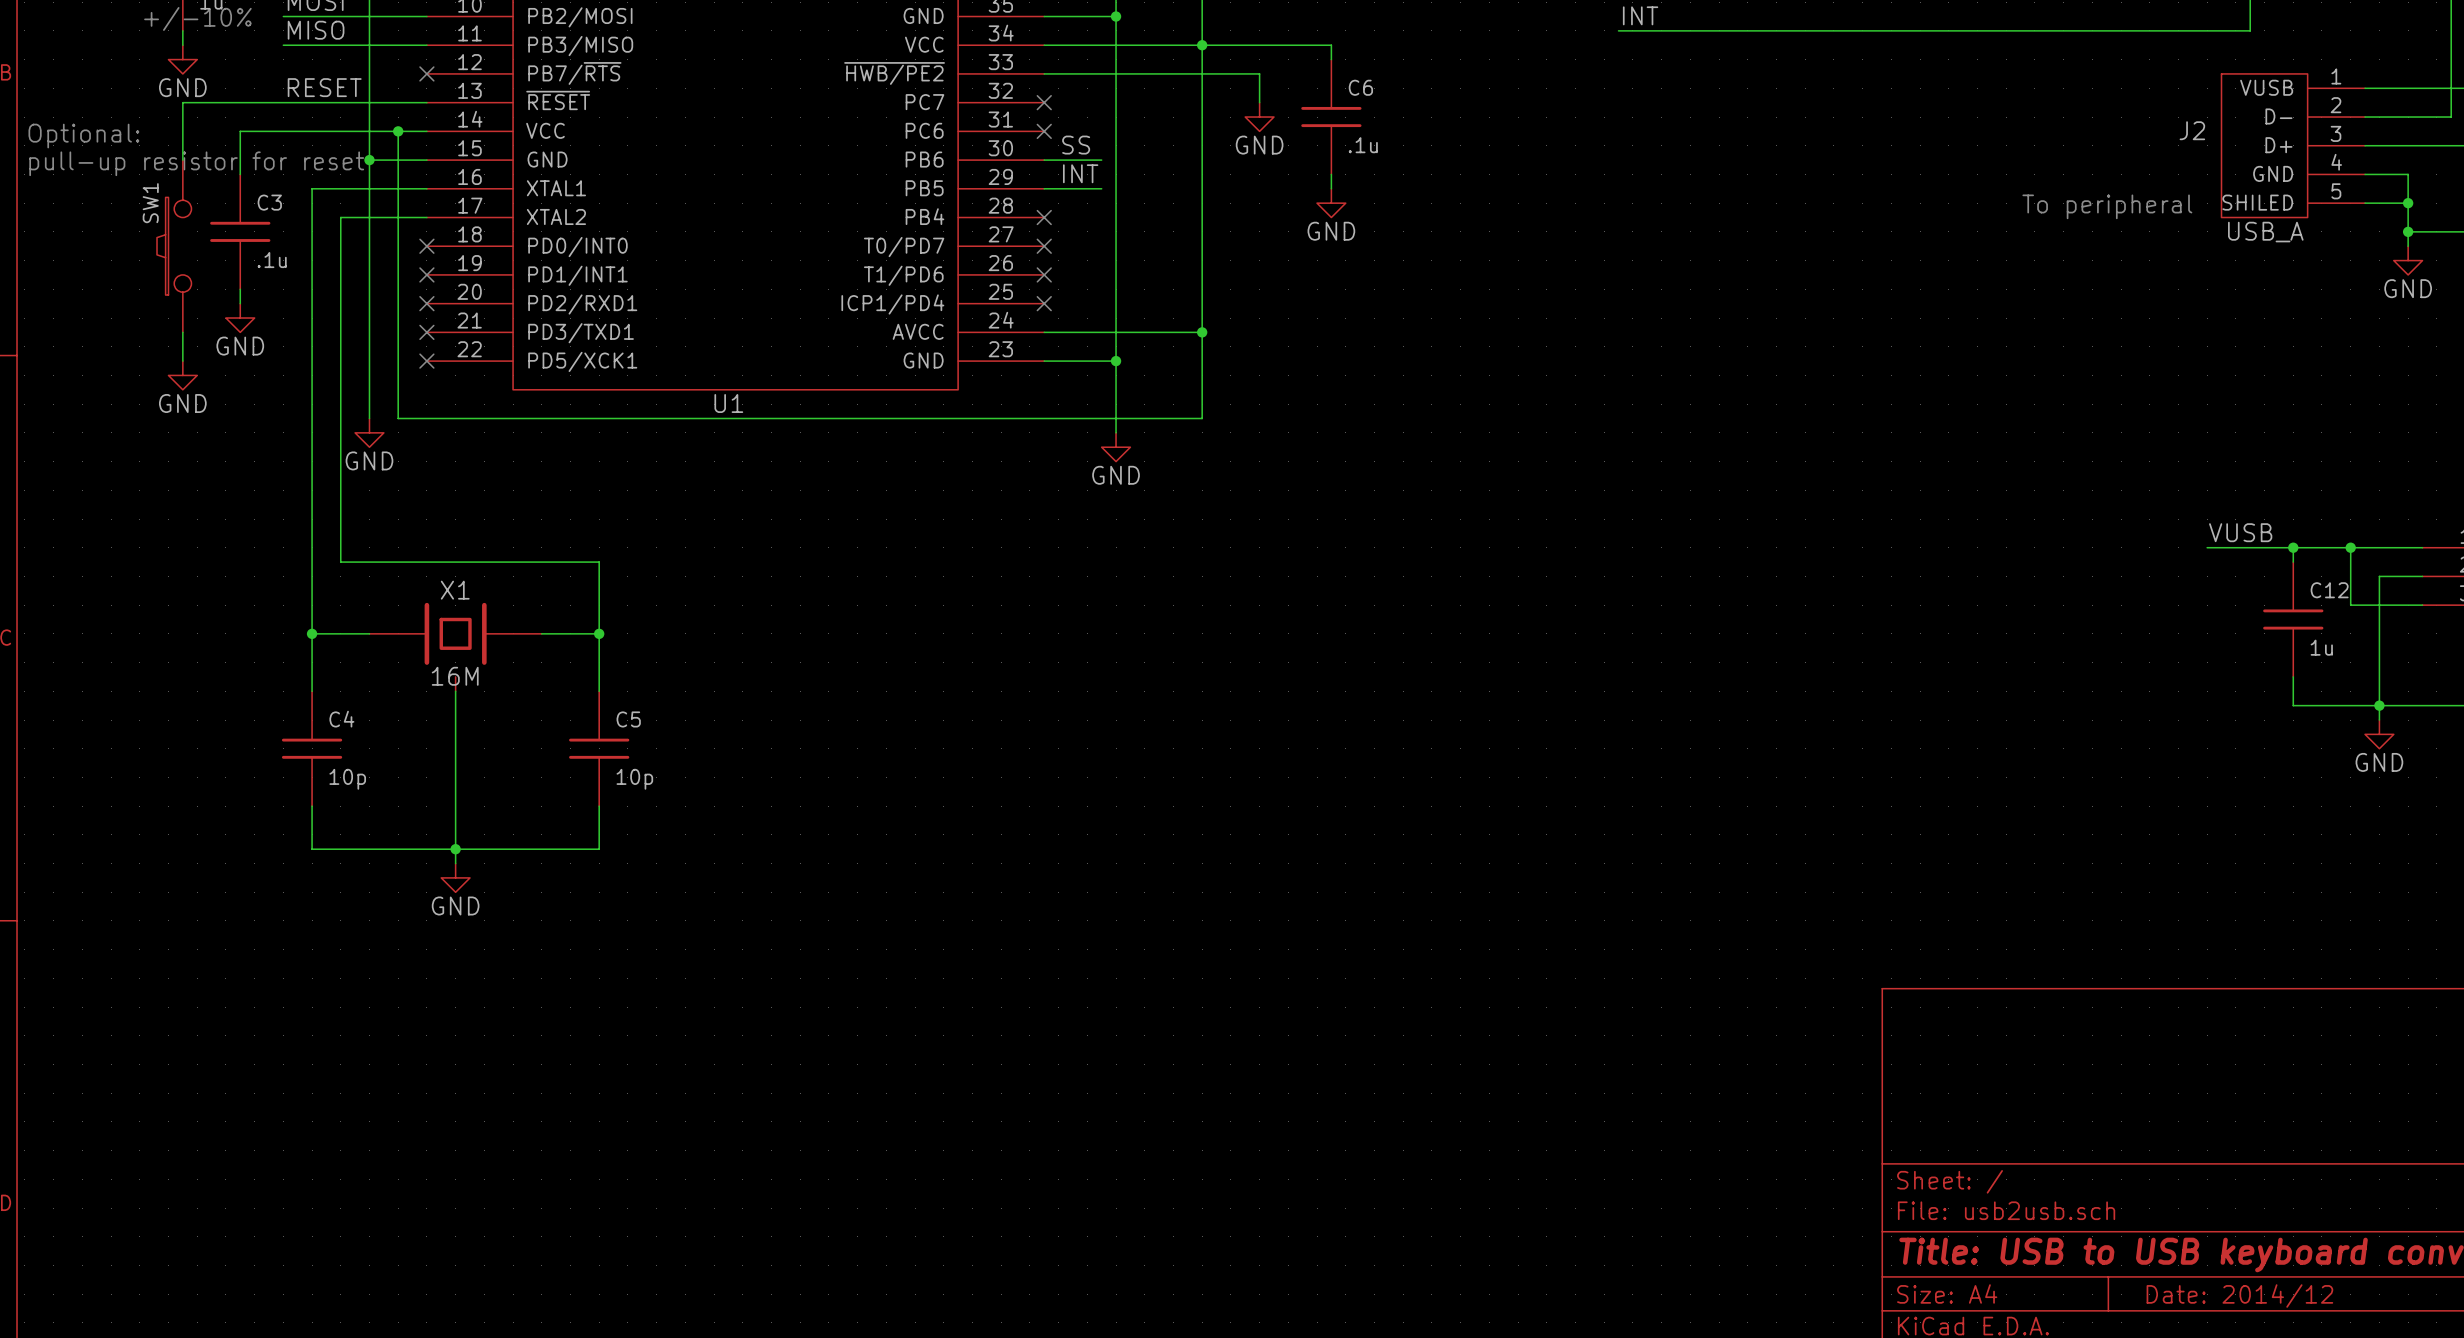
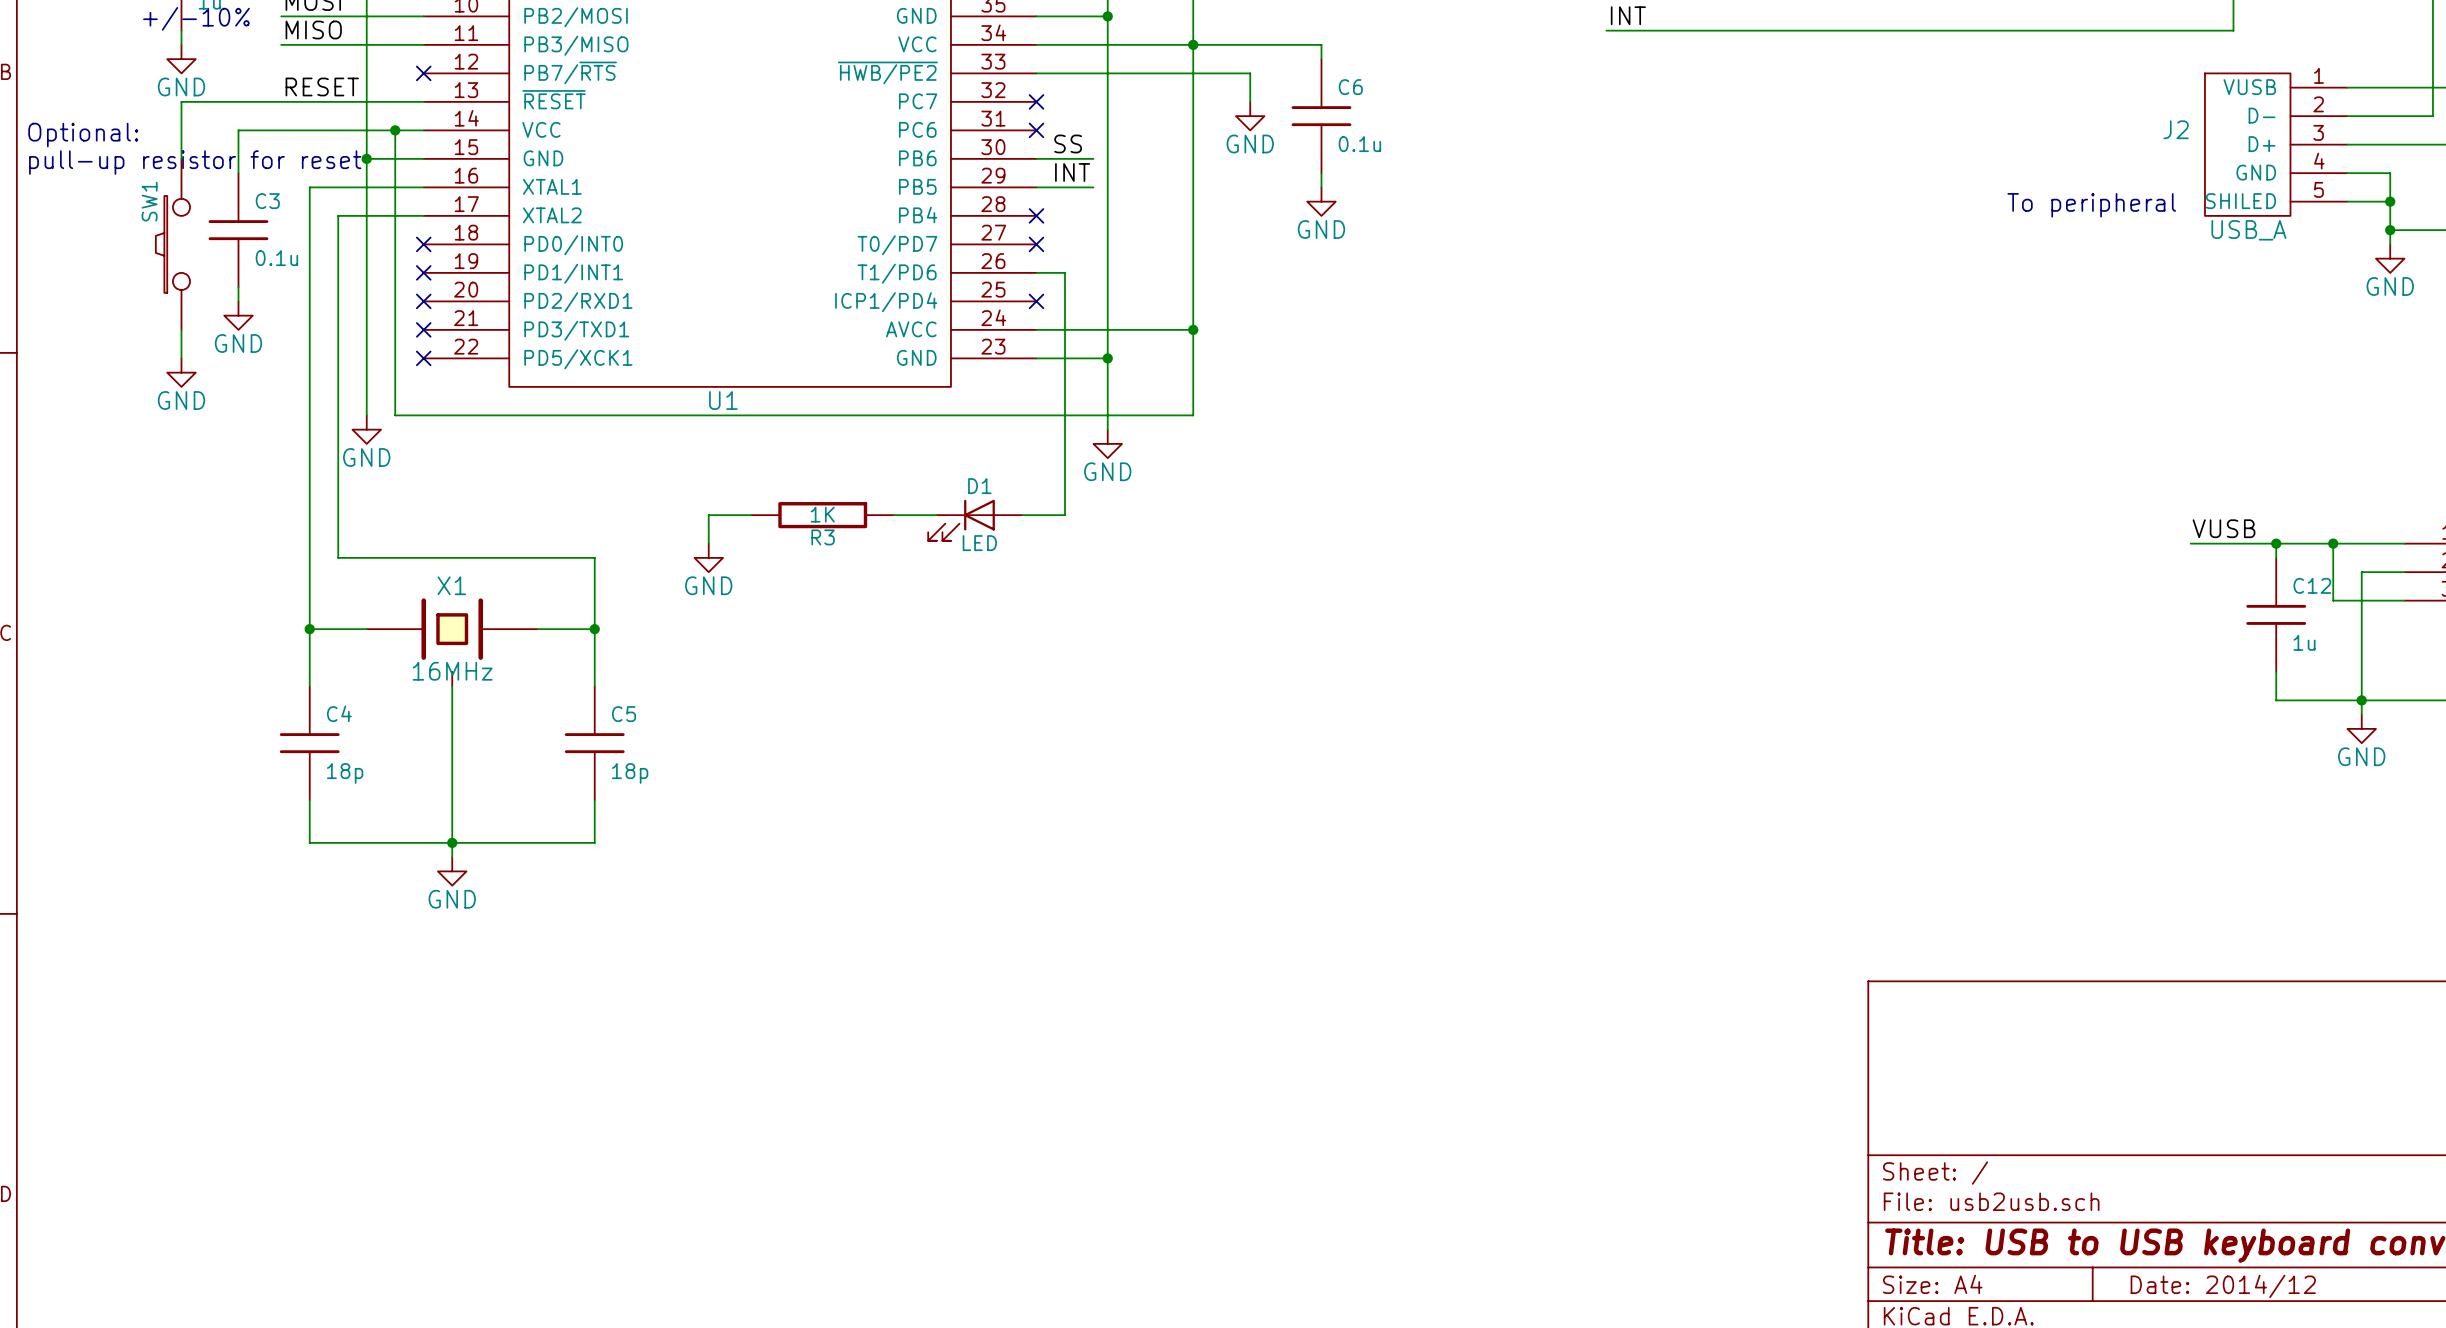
C6 value: .1u (1363, 145) -> 0.1u (1359, 144)
C3 value: .1u (272, 260) -> 0.1u (276, 258)
wire: none -> (1036, 272) (1064, 272) (1064, 515) (1022, 515)
no-connect mark: (1044, 274) -> none
wire: none -> (751, 515) (708, 515) (708, 543)
R3: none -> 1K (822, 515)
wire: none -> (893, 515) (936, 515)
D1: none -> LED (975, 520)
power symbol: none -> GND (708, 557)
X1 value: 16M (455, 676) -> 16MHz (452, 671)
C4 value: 10p (347, 779) -> 18p (345, 773)
C5 value: 10p (634, 779) -> 18p (630, 773)

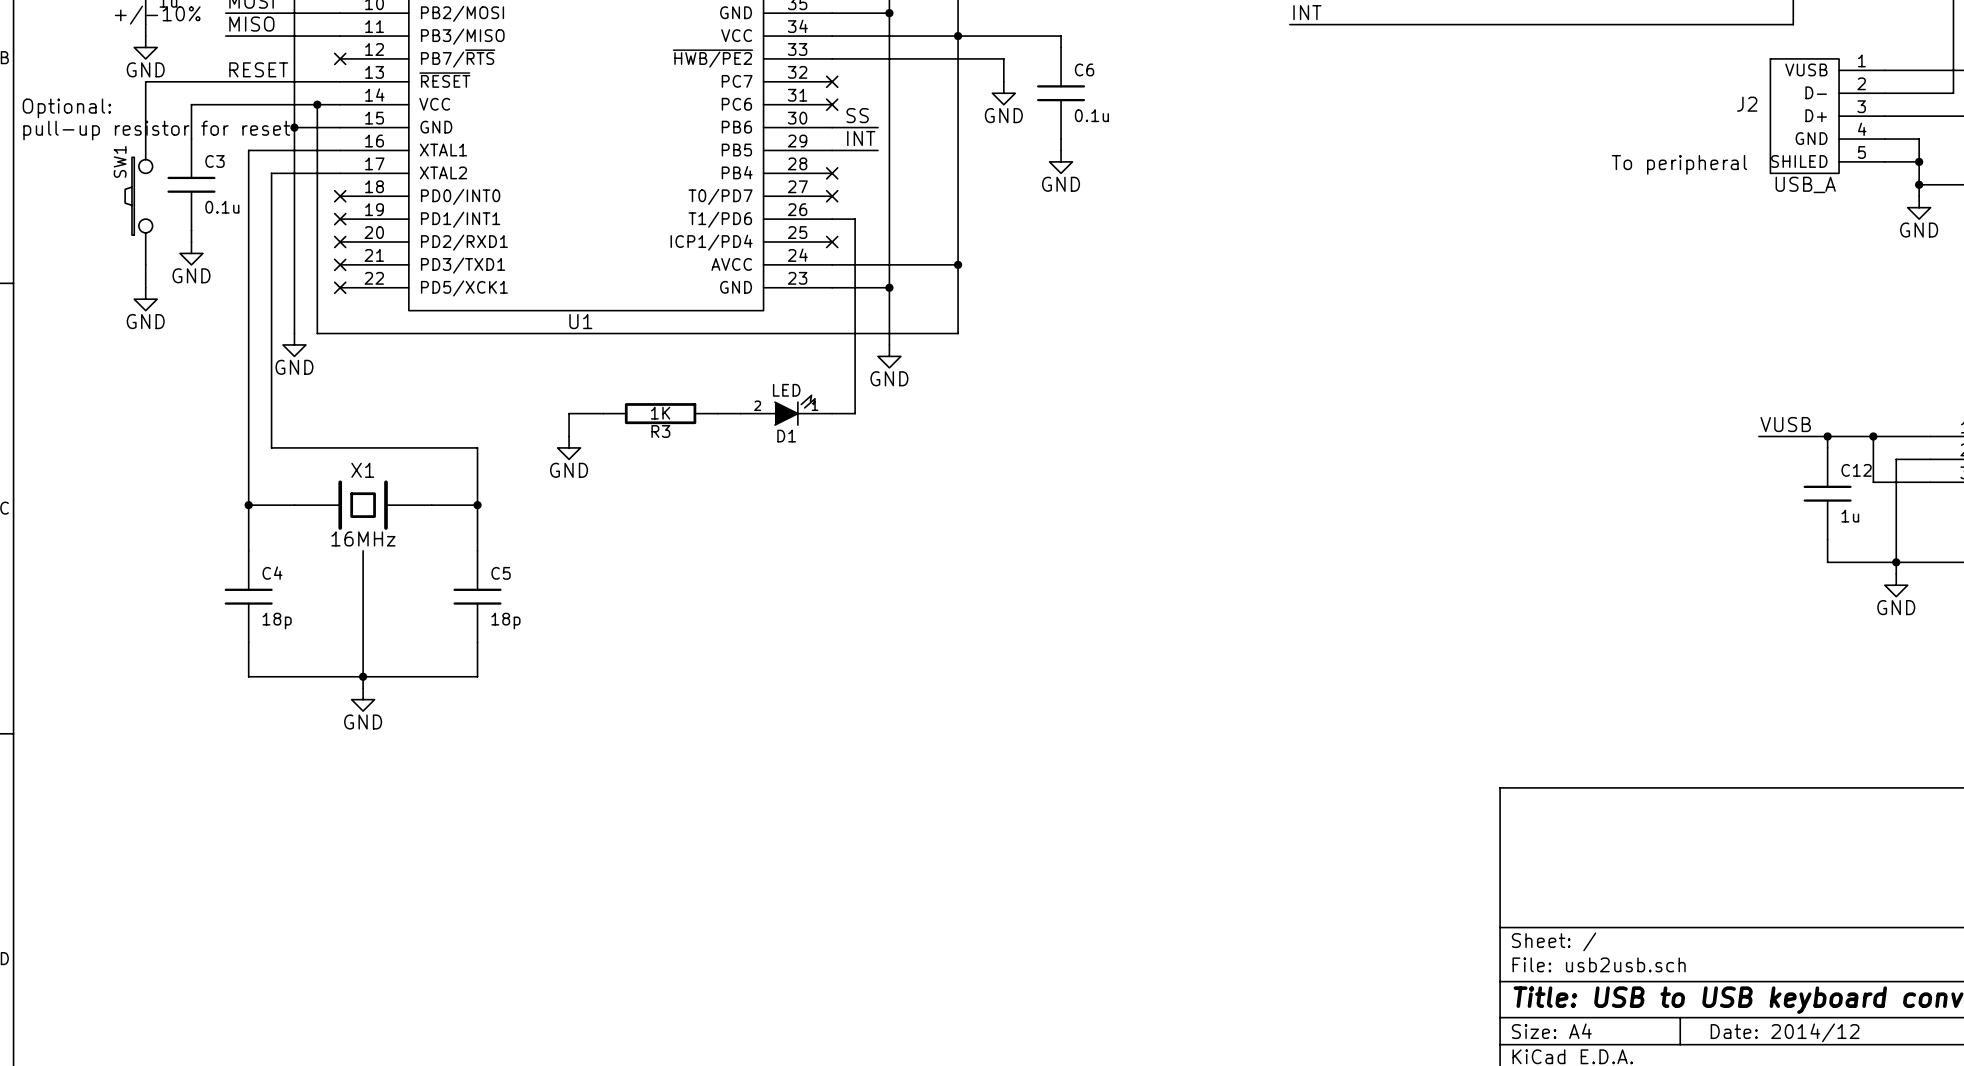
D1 name position: D1 (979, 486) -> D1 (786, 436)
D1 symbol: [928, 499, 1023, 541] -> [740, 395, 833, 426]
D1 value position: LED (979, 543) -> LED (786, 390)
X1 symbol: [366, 598, 538, 687] -> [294, 480, 432, 530]

